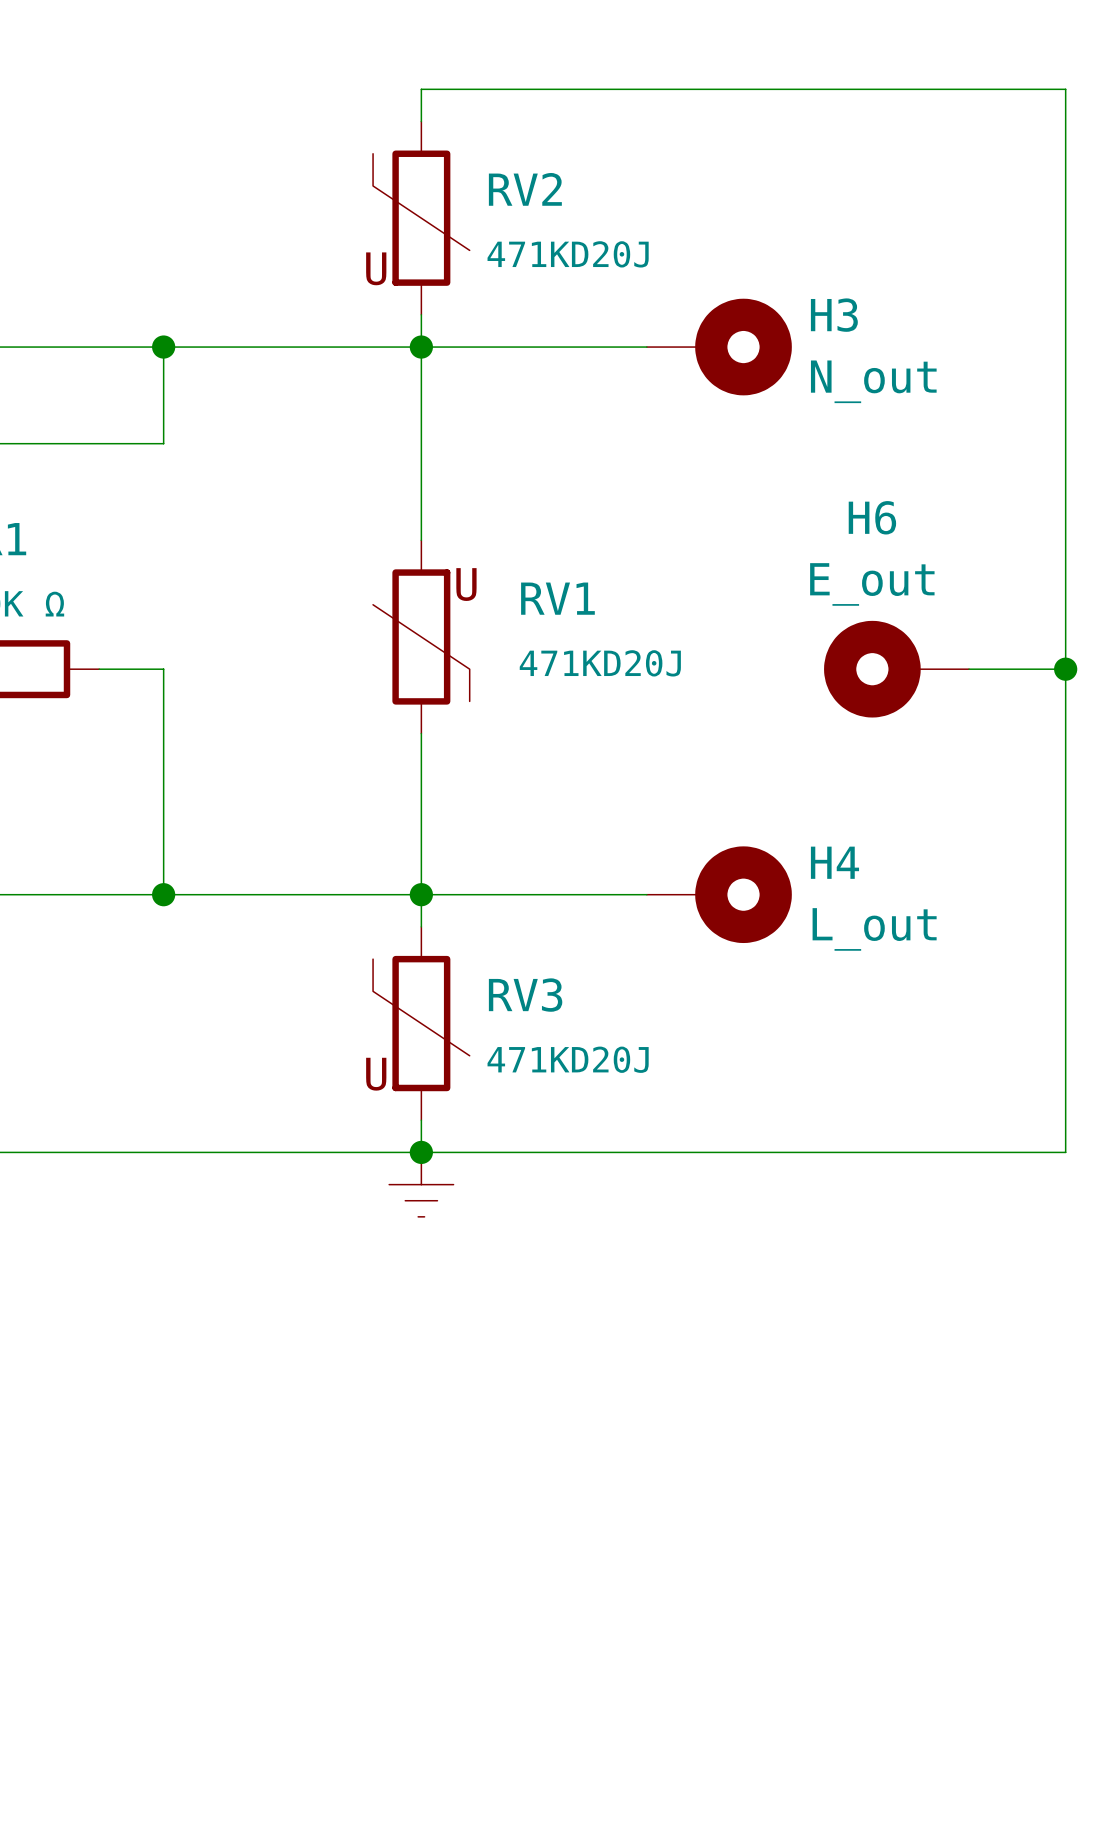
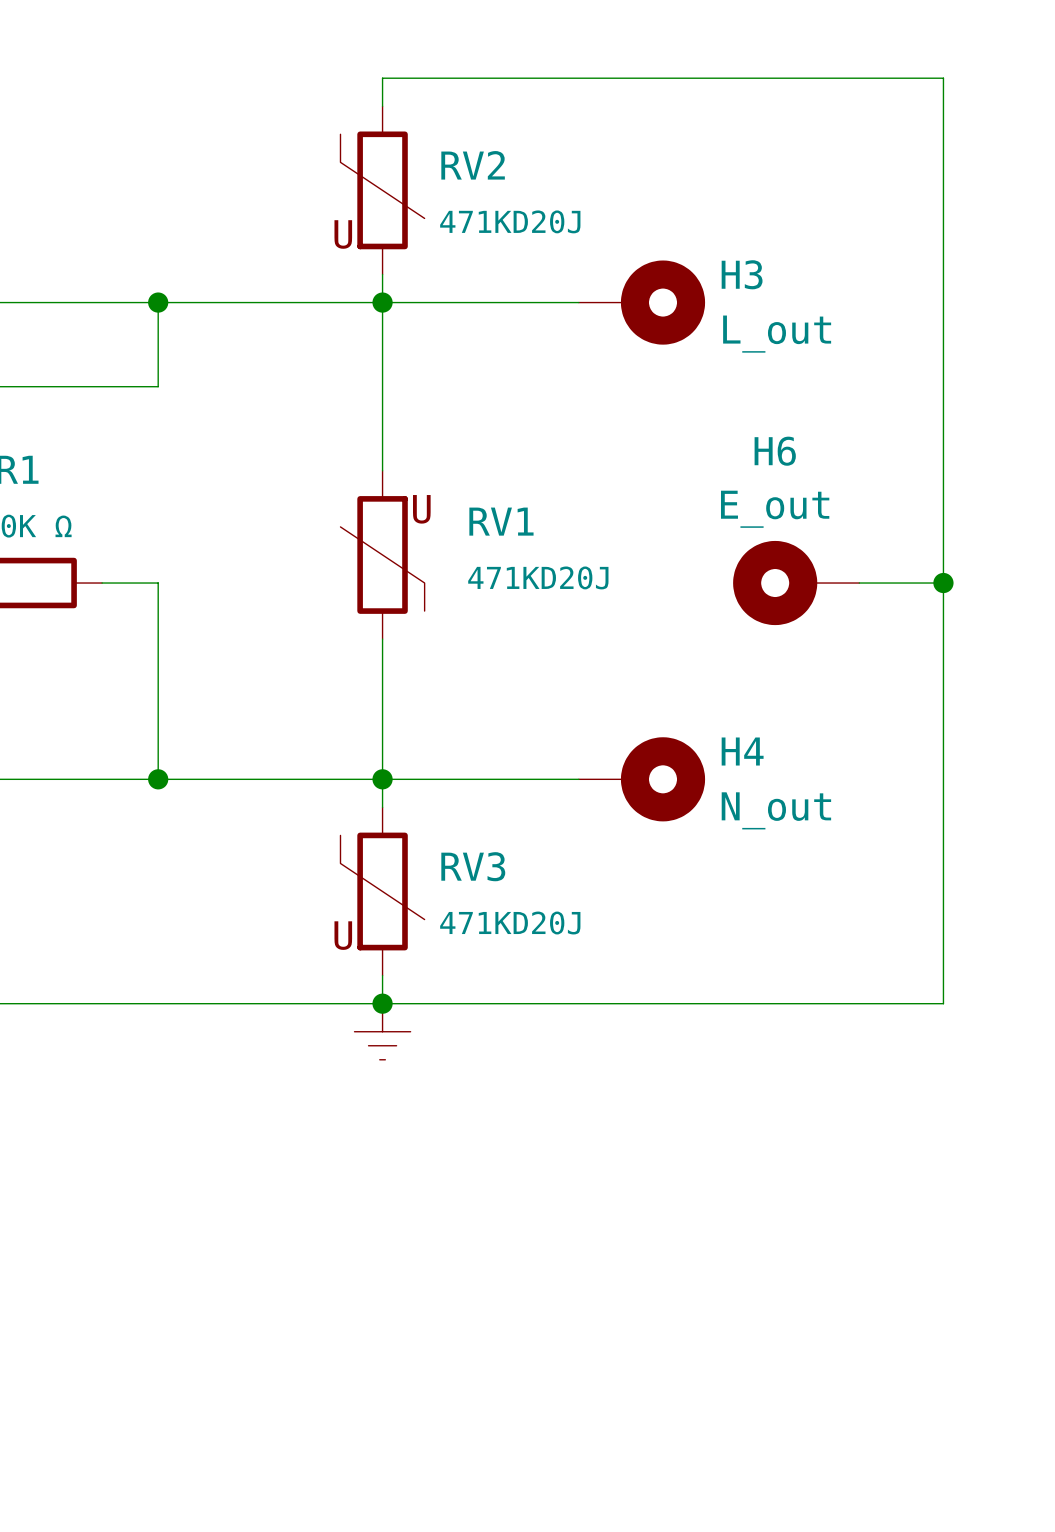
H3 value: N_out (873, 381) -> L_out (777, 334)
H4 value: L_out (874, 929) -> N_out (776, 810)

